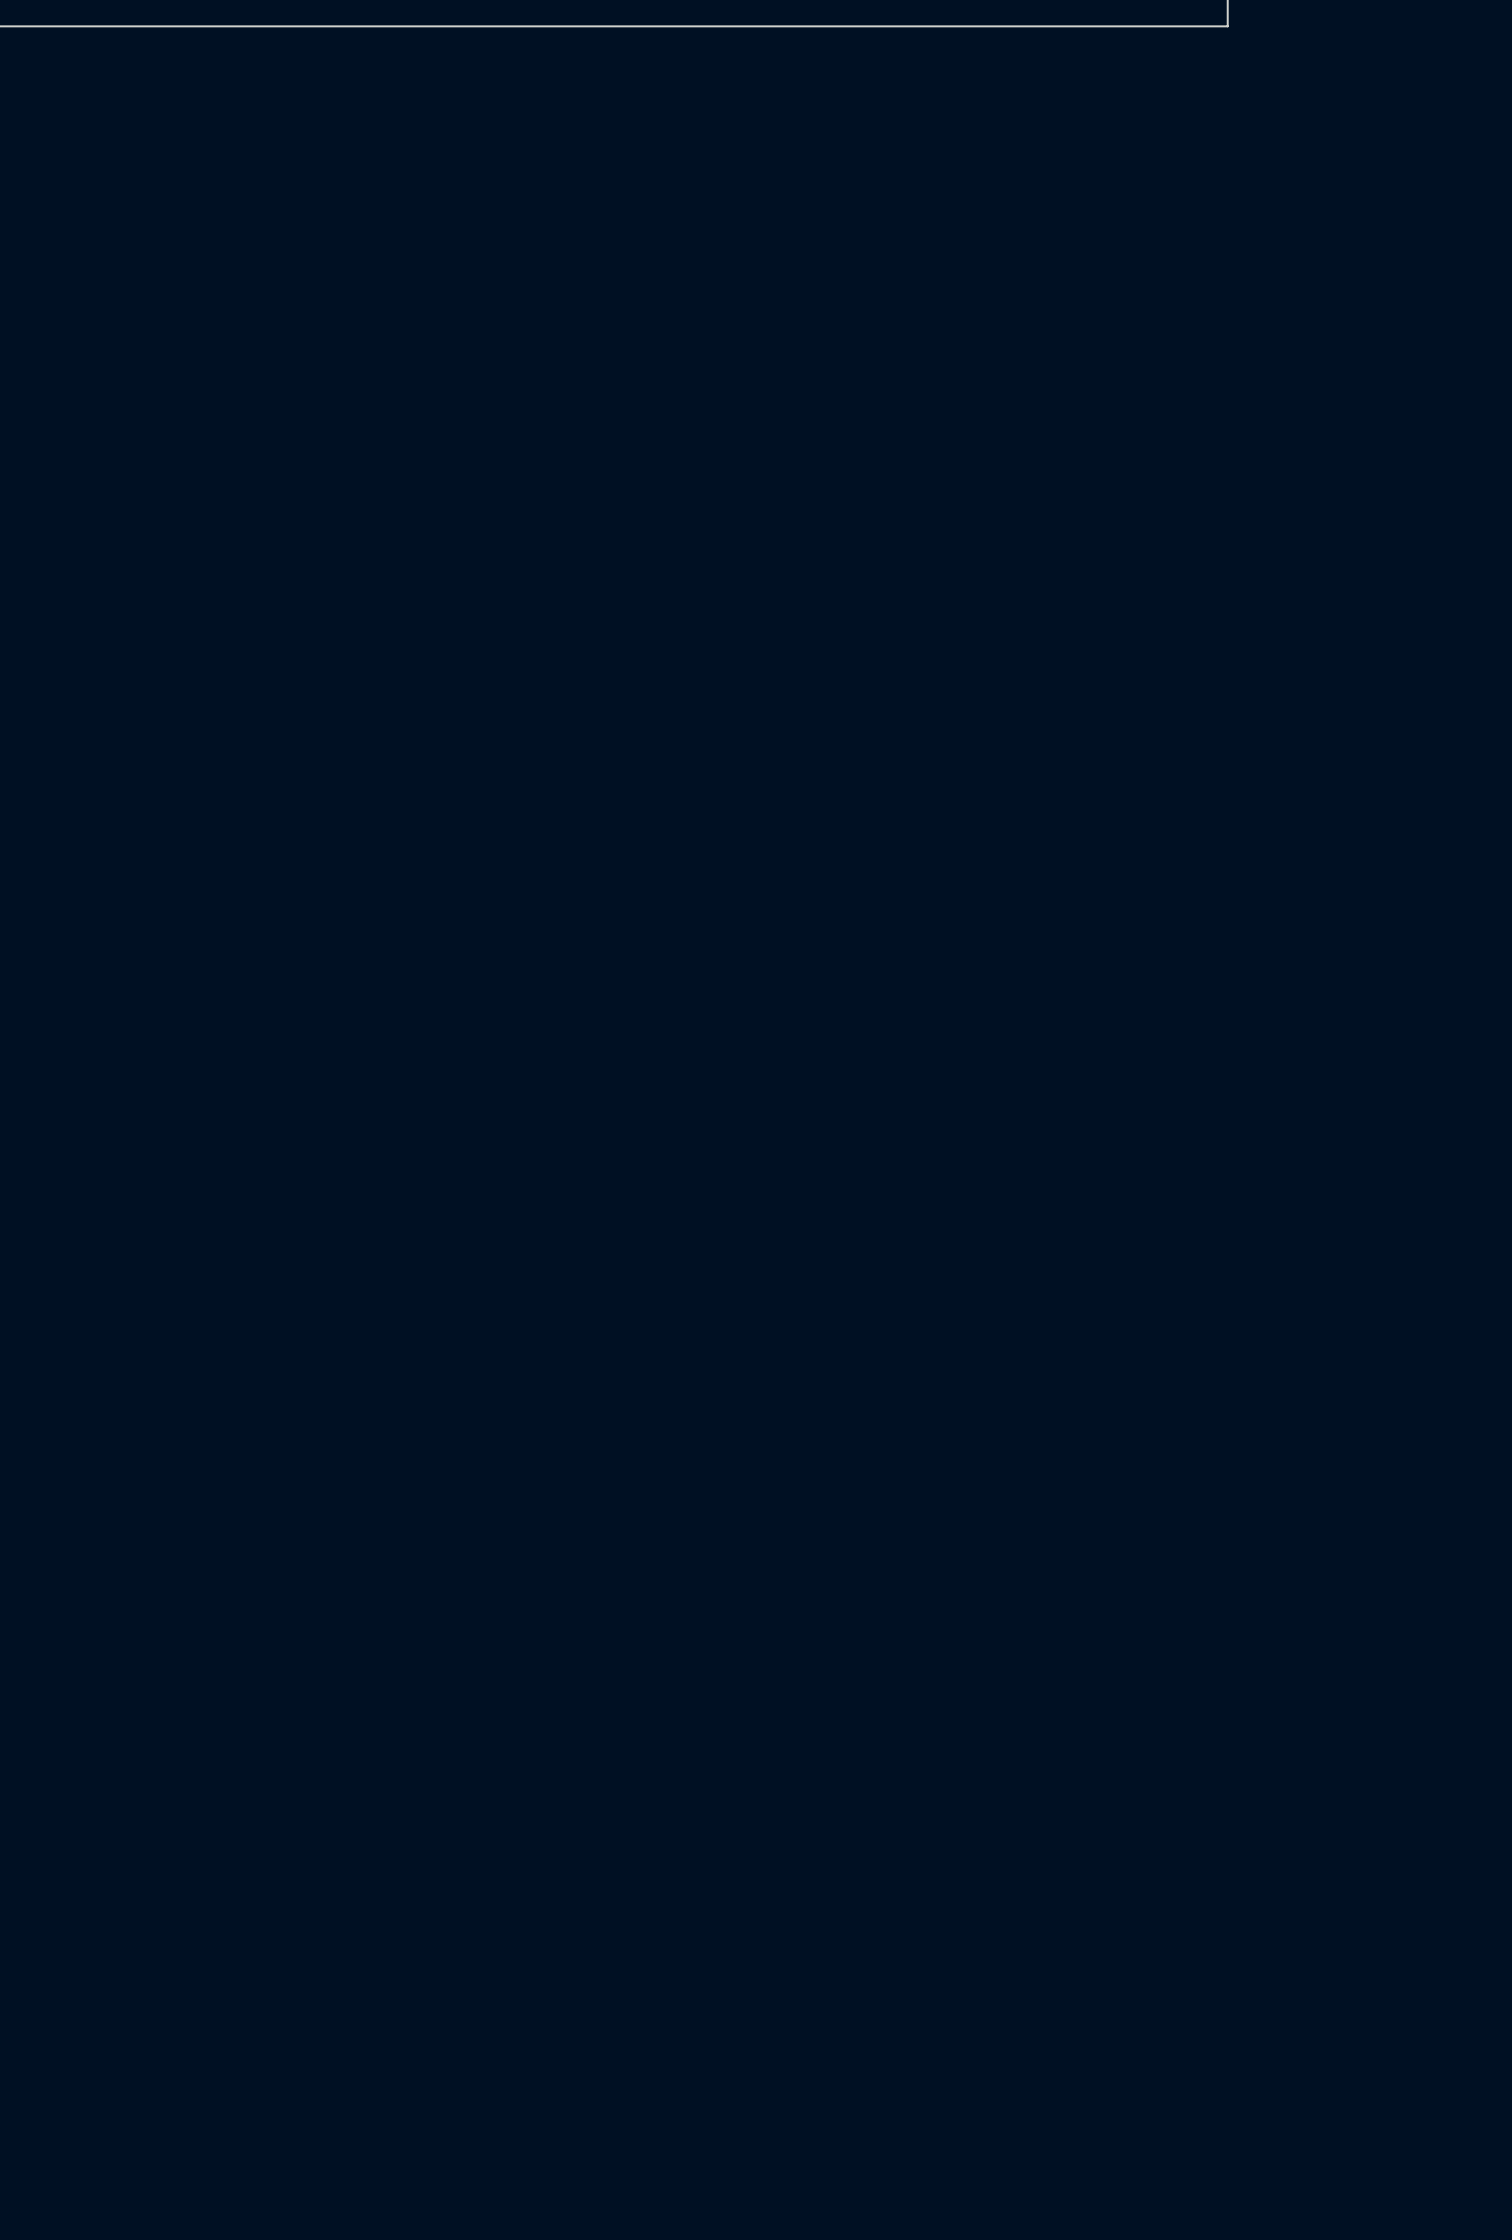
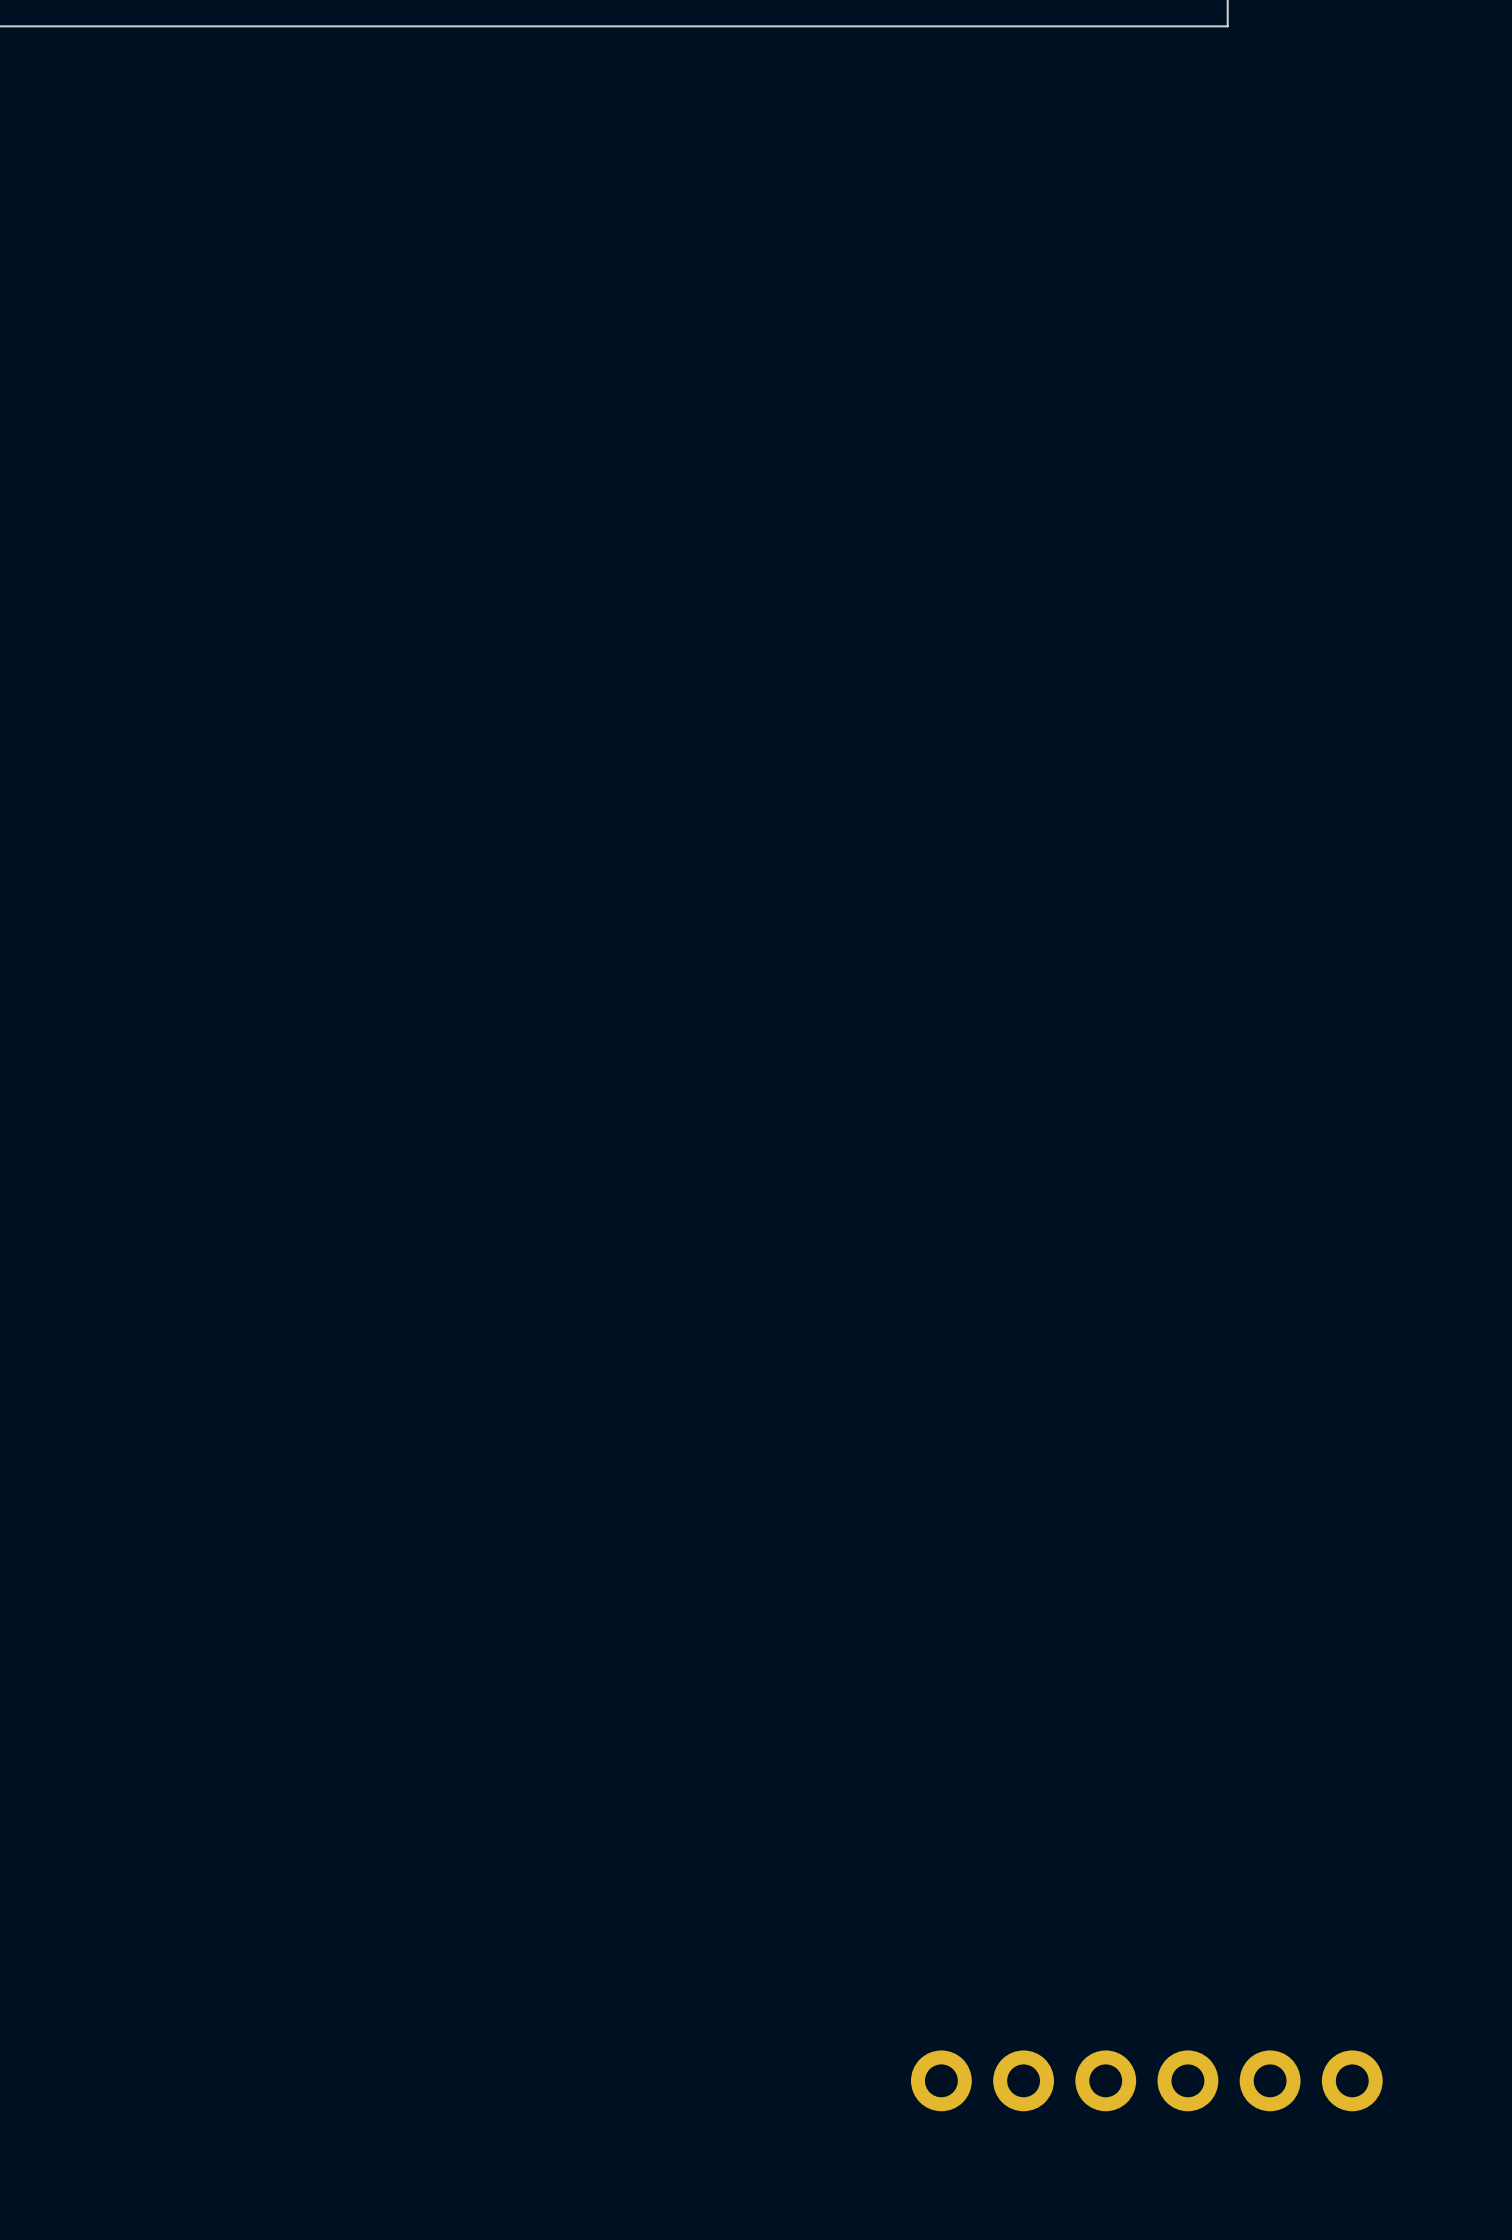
part: none -> (1146, 2080)

